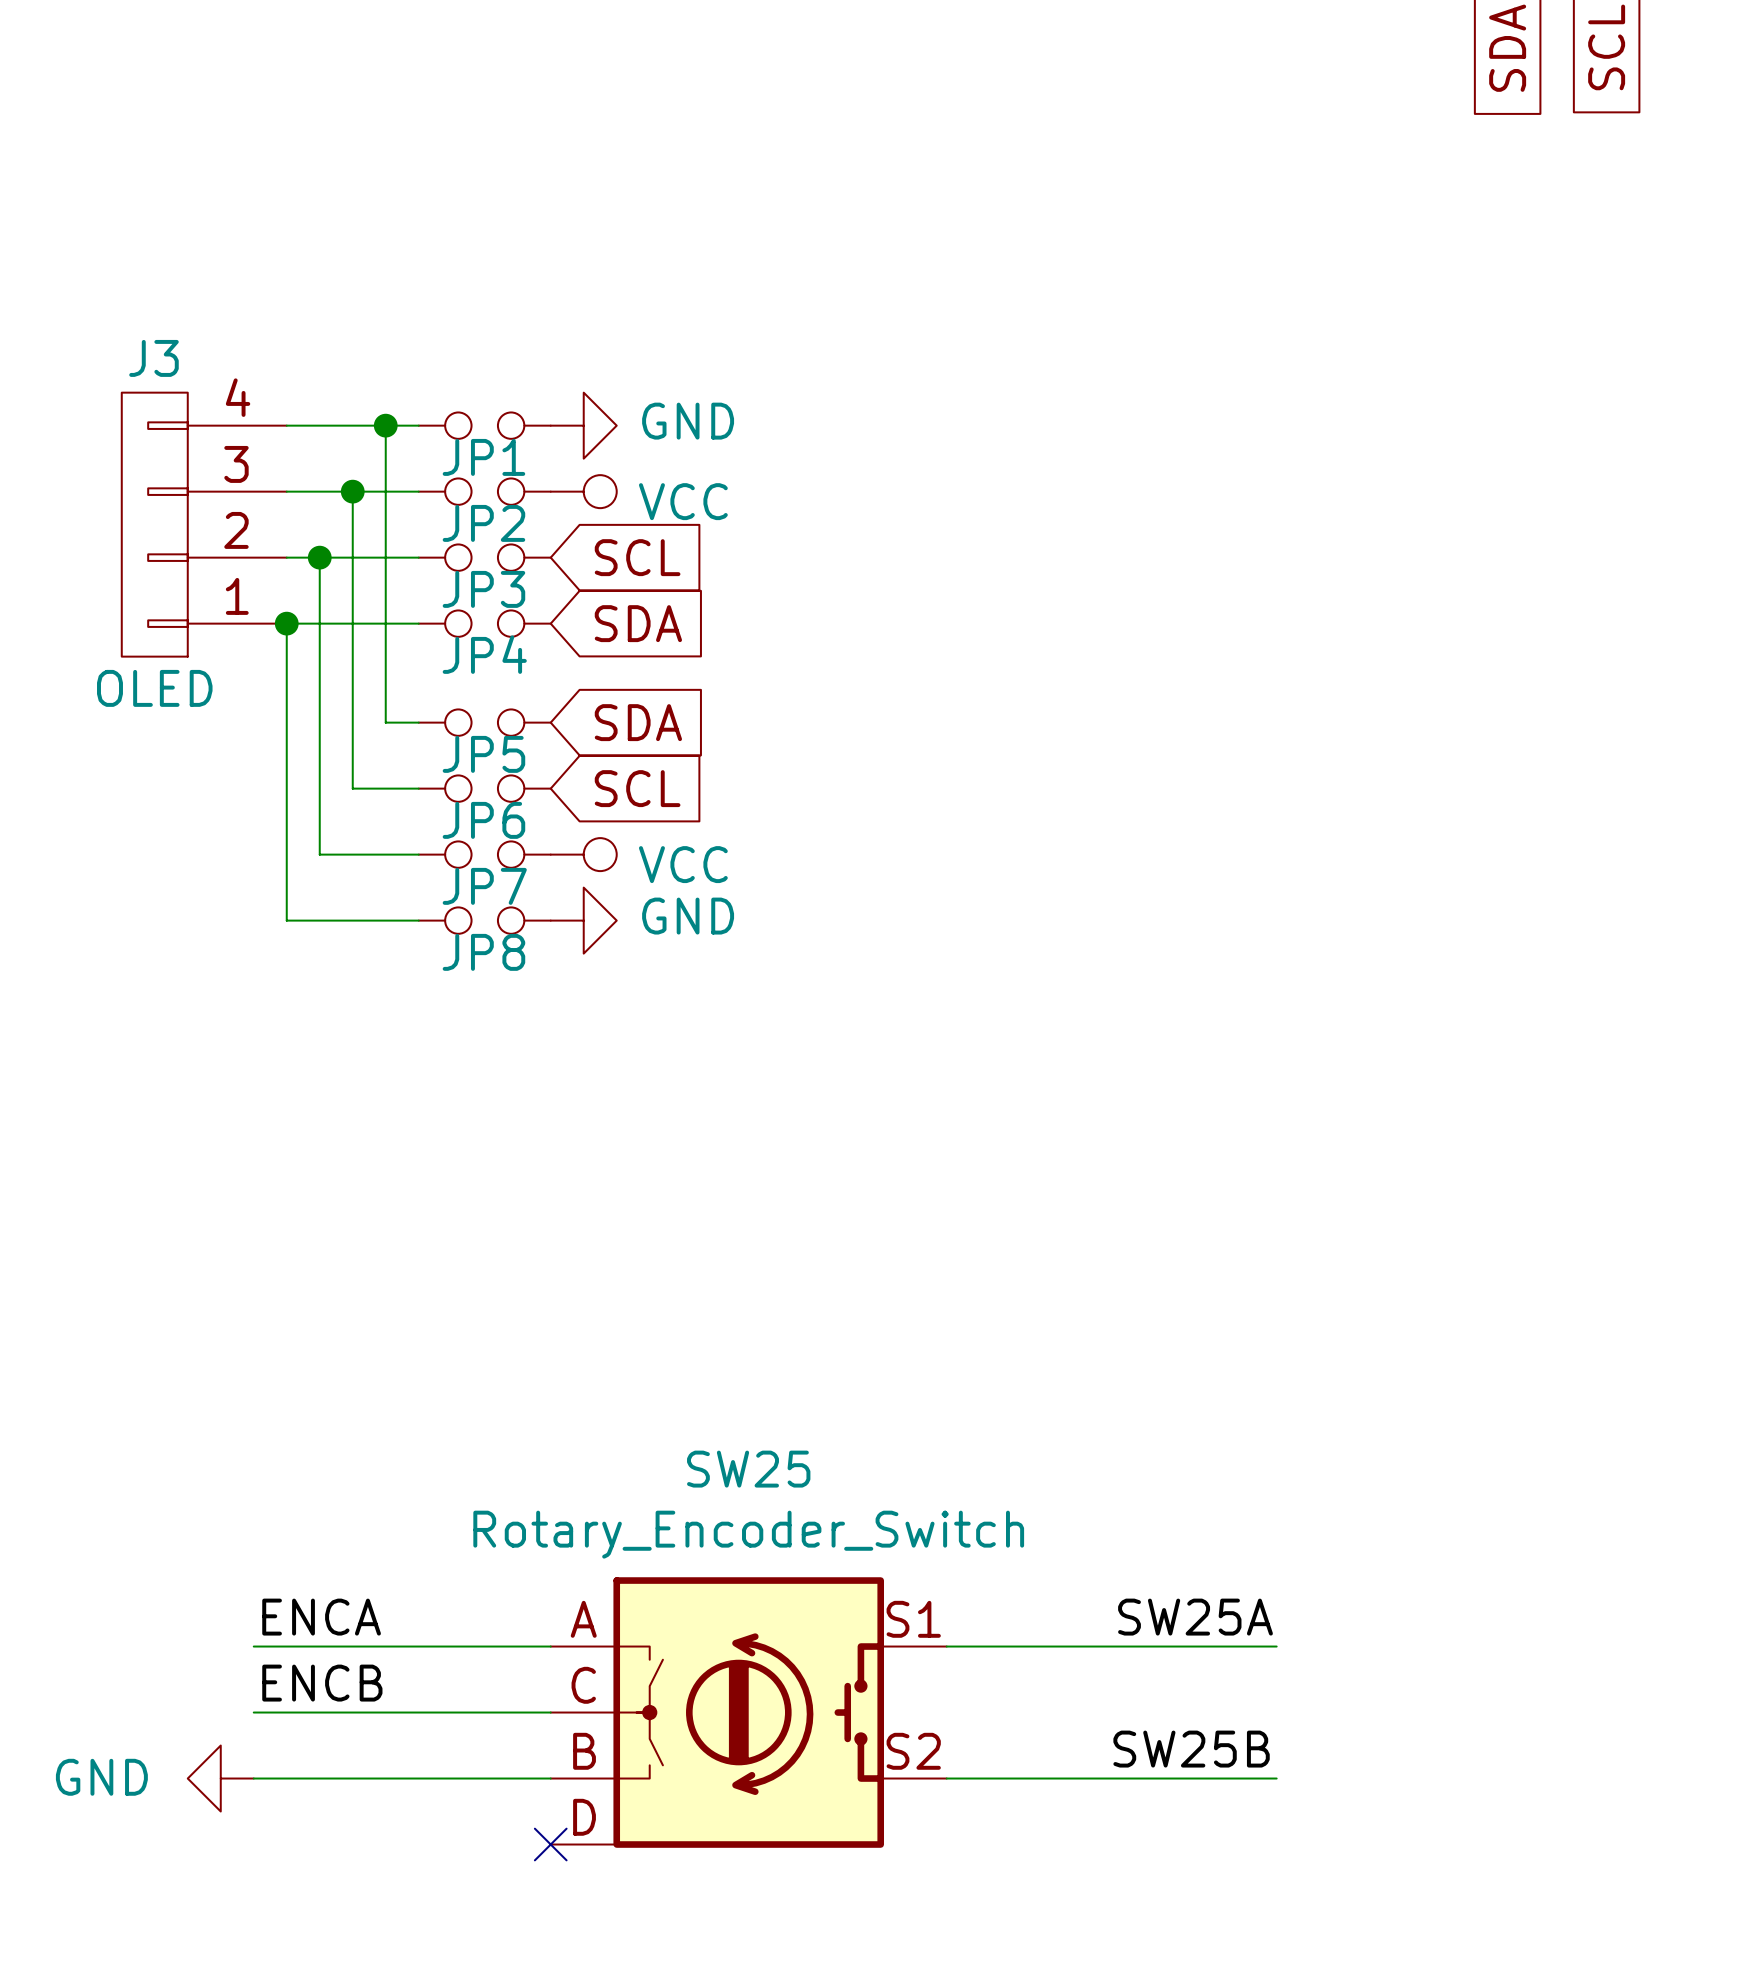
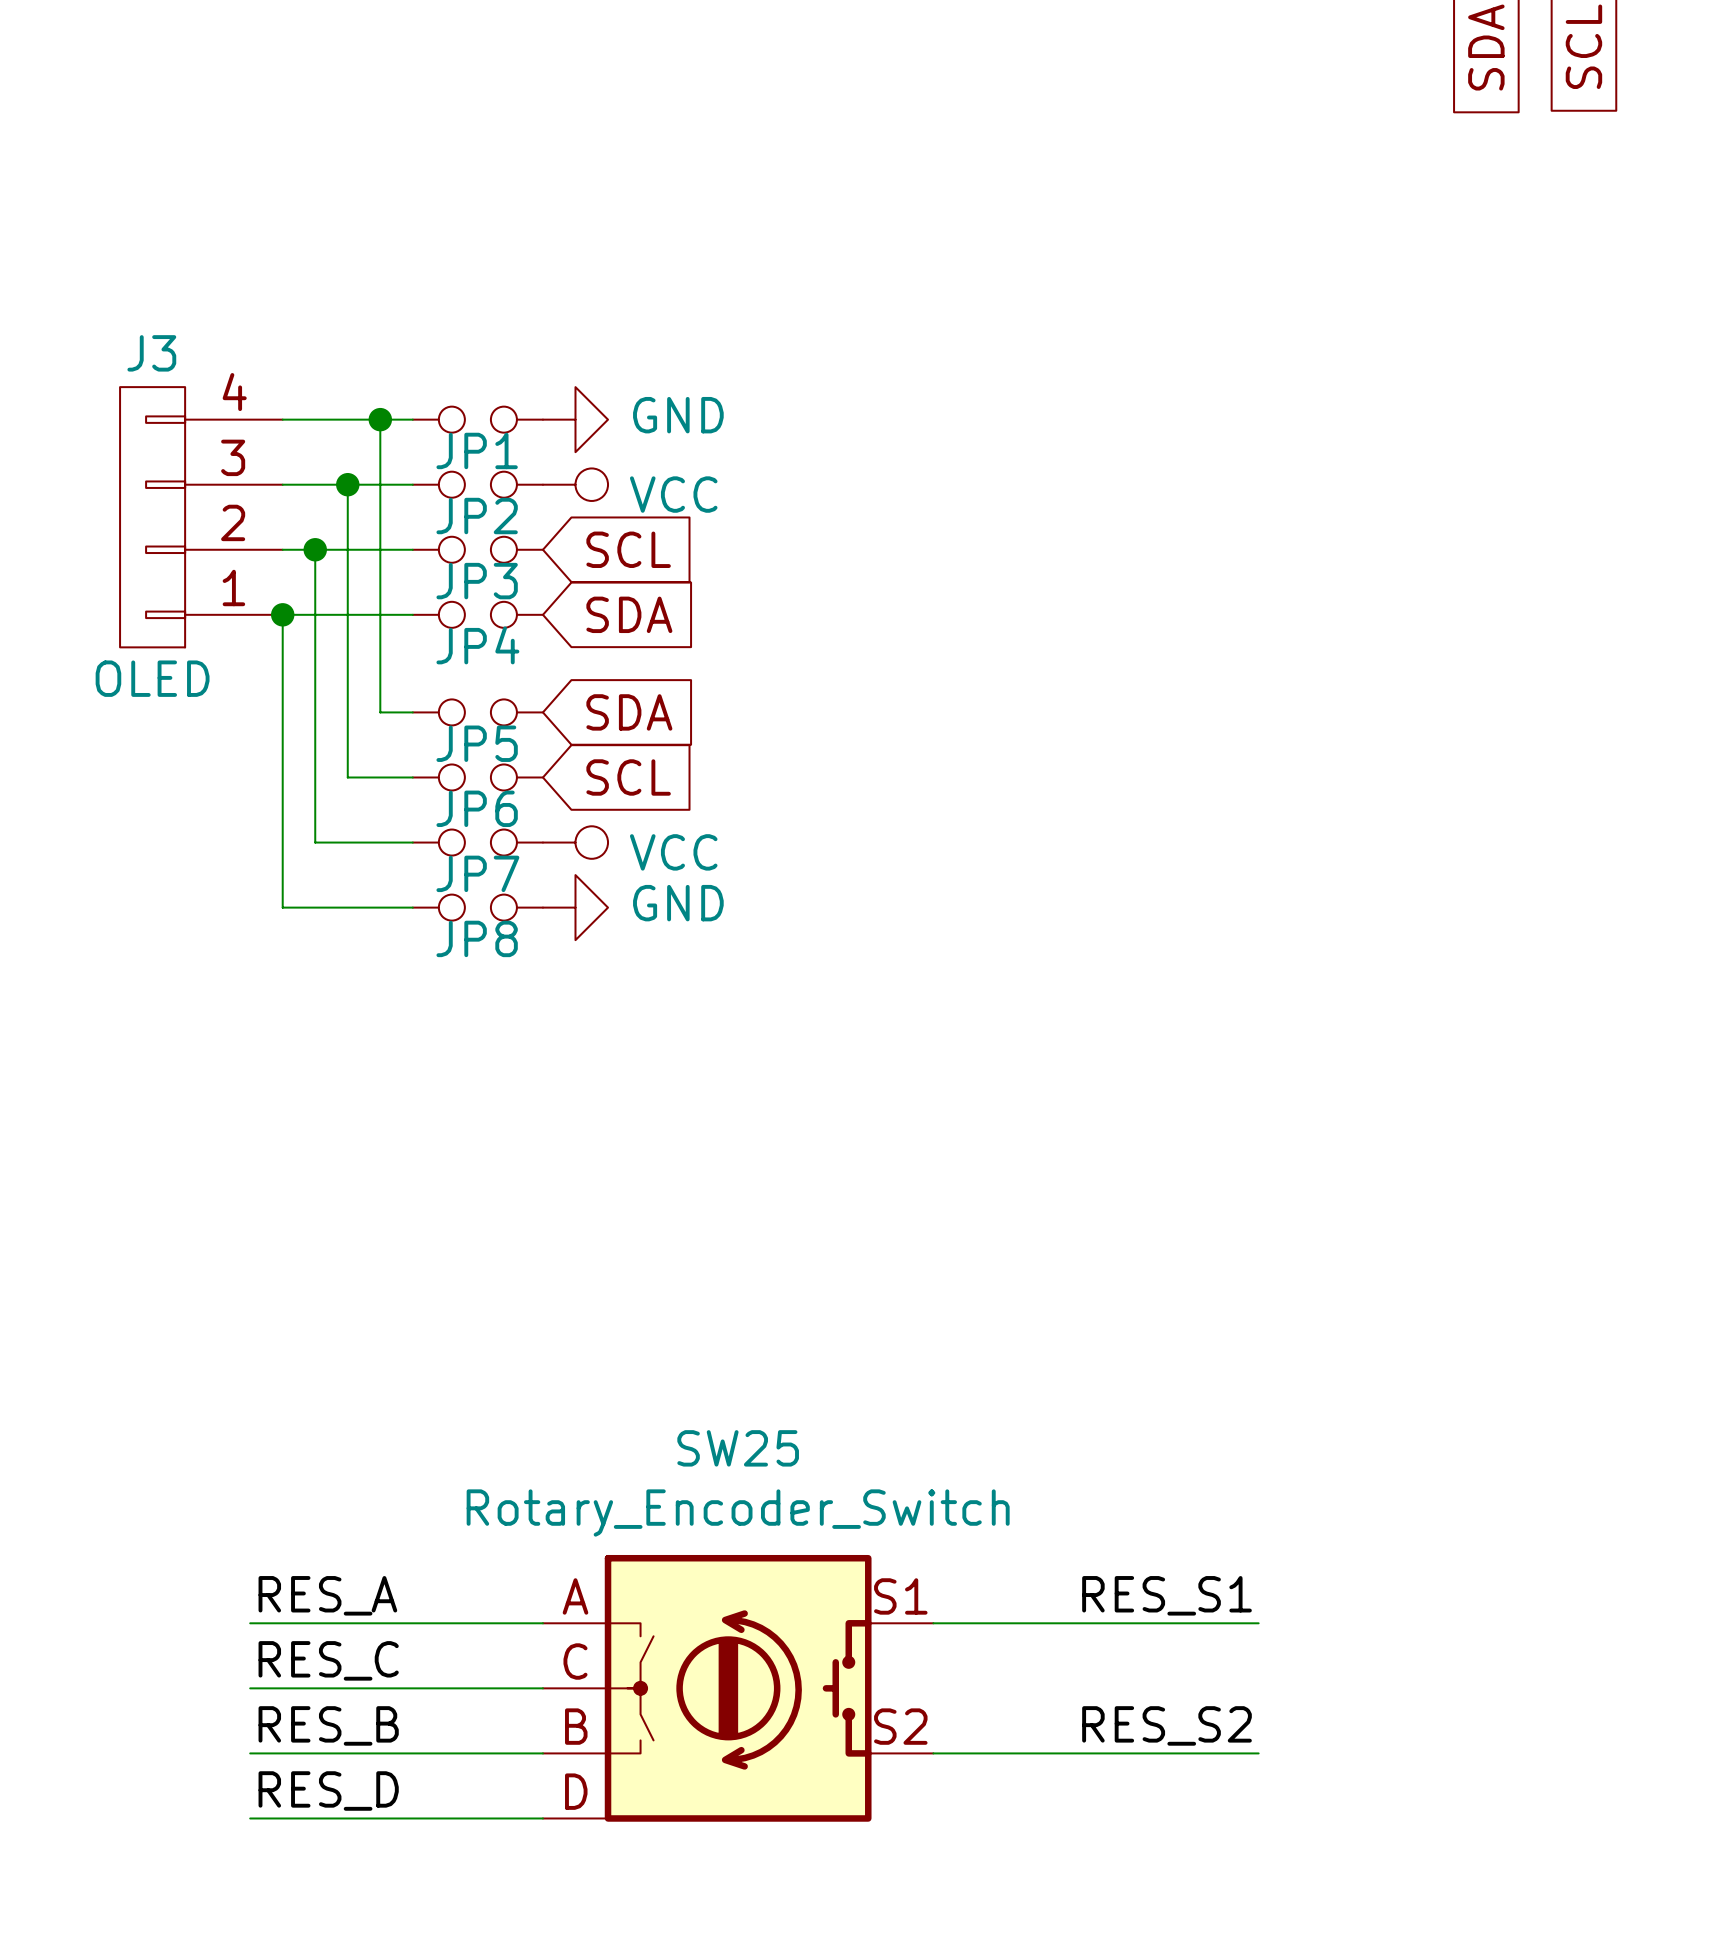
label: ENCA (321, 1617) -> RES_A (327, 1595)
label: SW25A (1195, 1617) -> RES_S1 (1167, 1595)
label: ENCB (322, 1683) -> RES_C (328, 1660)
label: SW25B (1191, 1749) -> RES_S2 (1167, 1725)
label: none -> RES_B (328, 1725)
power symbol: GND (220, 1778) -> none
label: none -> RES_D (328, 1790)
wire: none -> (250, 1818) (542, 1818)
no-connect mark: (550, 1844) -> none

